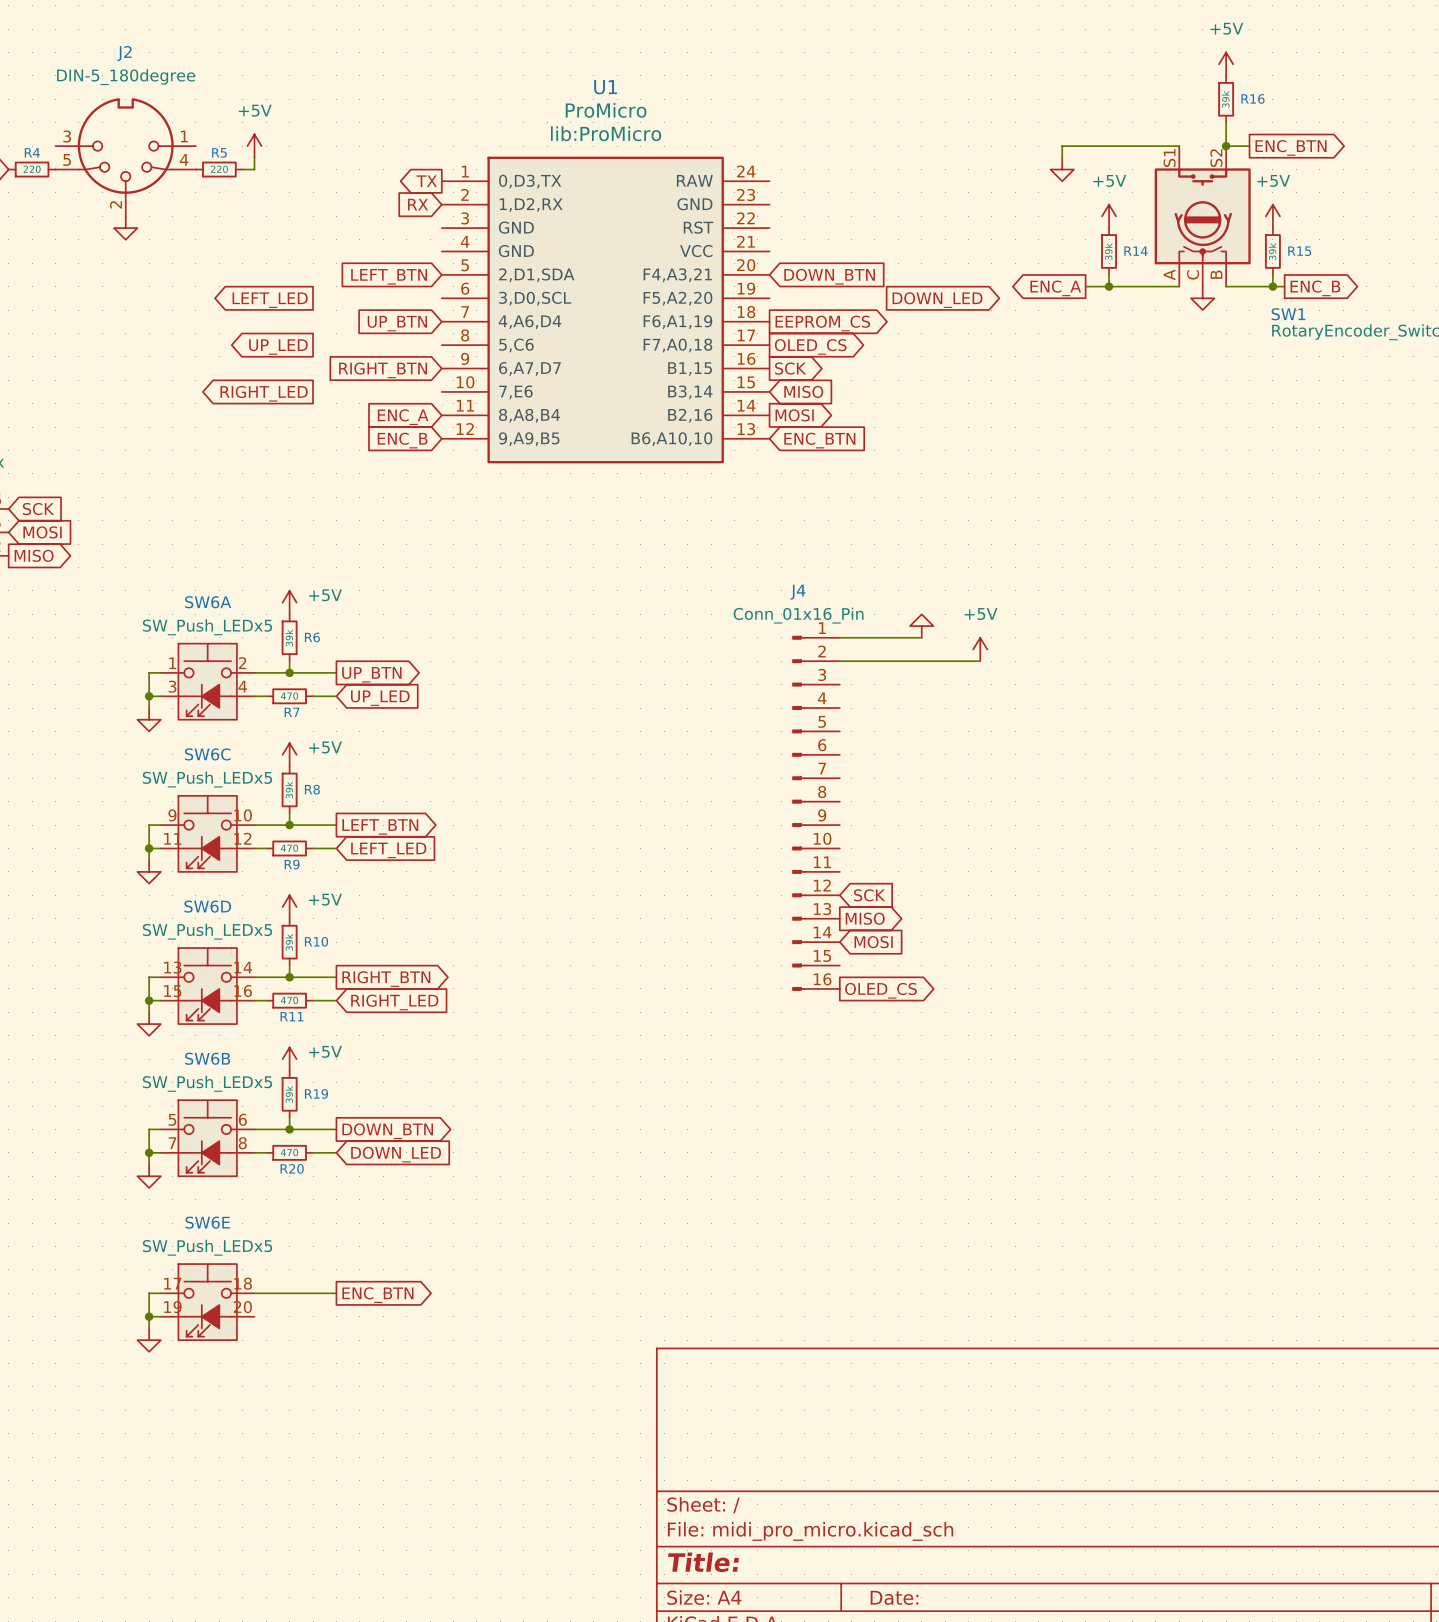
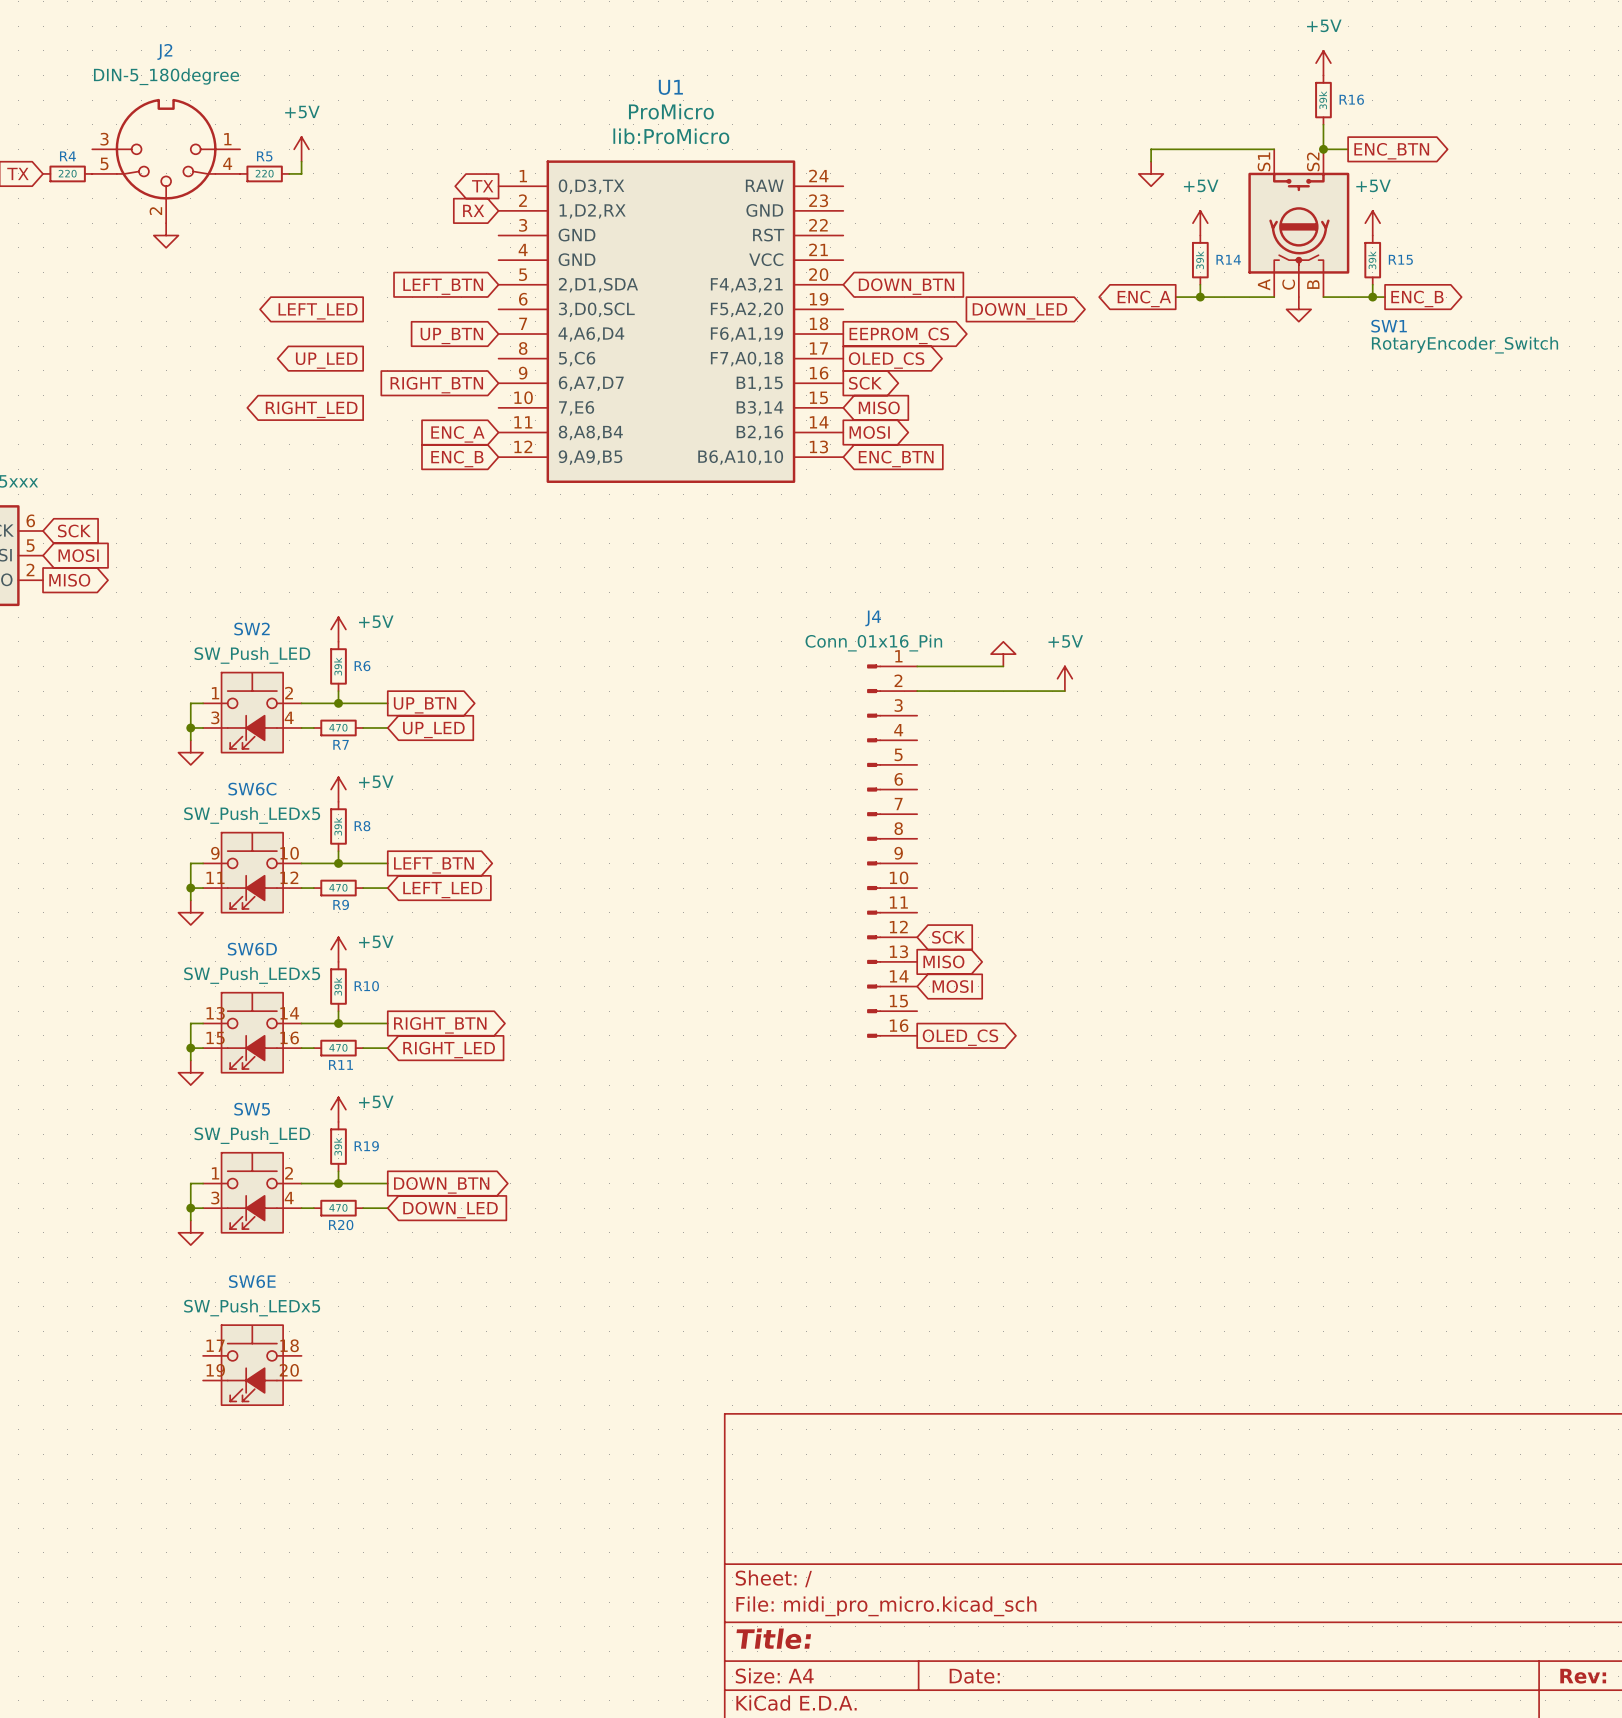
SW6A name: SW6A (208, 602) -> SW2 (252, 629)
SW6A value: SW_Push_LEDx5 (207, 627) -> SW_Push_LED (252, 655)
SW6B name: SW6B (207, 1058) -> SW5 (252, 1109)
SW6B value: SW_Push_LEDx5 (207, 1083) -> SW_Push_LED (252, 1135)
SW6B pin number: 5 (172, 1119) -> 1 (215, 1173)
SW6B pin number: 6 (242, 1119) -> 2 (289, 1173)
SW6B pin number: 7 (172, 1143) -> 3 (215, 1198)
SW6B pin number: 8 (242, 1143) -> 4 (289, 1198)
wire: (160, 1293) (149, 1293) (149, 1328) -> none
wire: (254, 1293) (336, 1293) -> none
global label: ENC_BTN (377, 1295) -> none
wire: (149, 1316) (160, 1316) -> none
junction: (149, 1316) -> none
power symbol: (149, 1340) -> none

